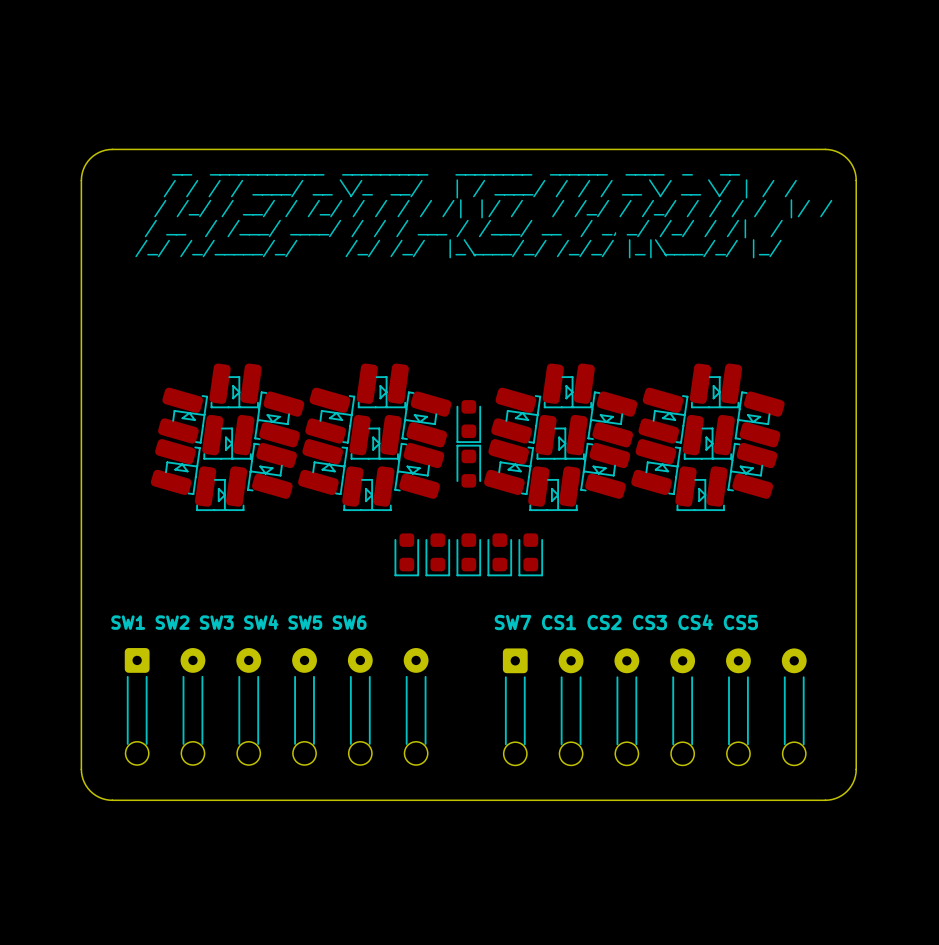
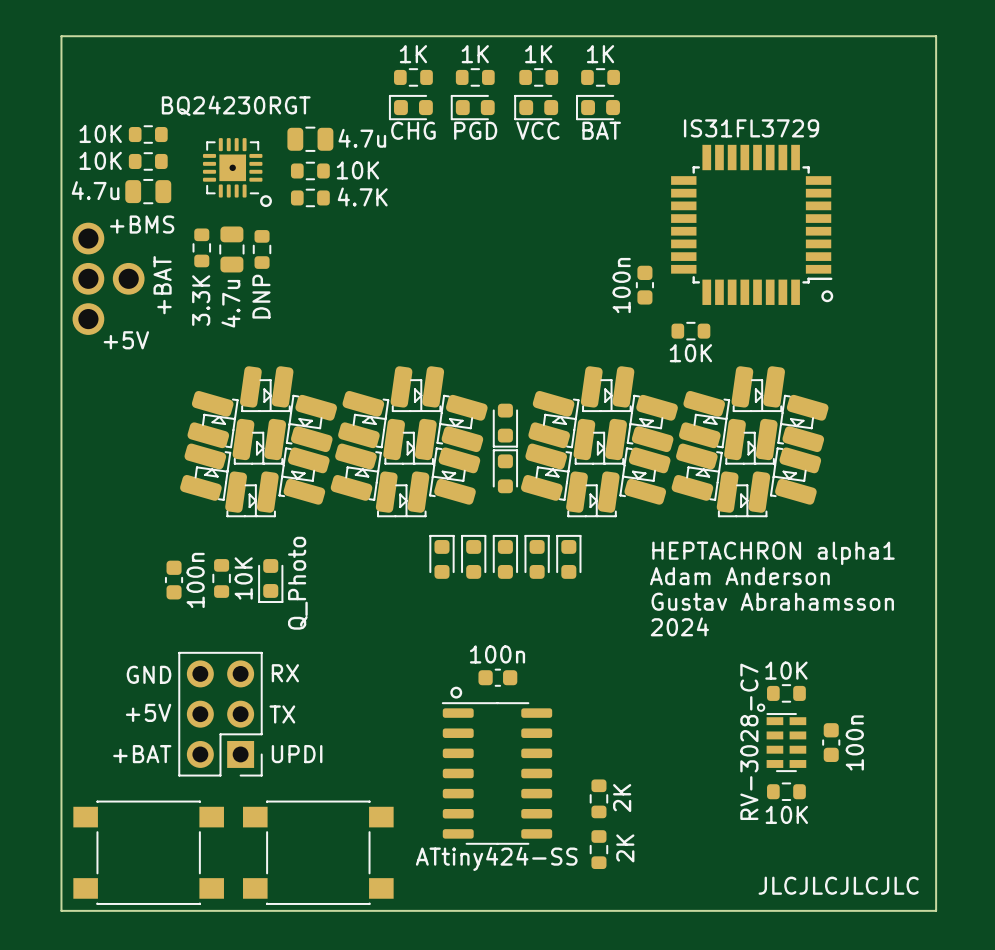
part: none -> 1K (413, 77)
part: none -> 1K (475, 77)
part: none -> 1K (538, 77)
part: none -> 1K (600, 77)
part: none -> CHG (410, 107)
part: none -> PGD (472, 107)
part: none -> VCC (536, 107)
part: none -> BAT (598, 107)
part: none -> 10K (148, 134)
part: none -> 4.7u (310, 139)
board edge: (112, 149) (825, 149) (835, 151) (844, 156) (853, 166) (856, 180) (856, 769) (854, 779) (849, 788) (838, 797) (825, 800) (112, 800) (102, 798) (93, 793) (84, 782) (81, 769) (81, 180) (84, 166) (90, 158) (102, 151) (112, 149) -> (61, 36) (61, 910) (936, 910) (936, 36) (61, 36)
part: none -> 10K (148, 161)
part: none -> BQ24230RGT (232, 167)
part: none -> 10K (310, 170)
text: __ ____________ _________ ________ ______ ____ _ __ (456, 174) -> none
text: / / / / ____/ __ \/_ __/ | / ____/ / / / __ \/ __ \/ | / / (480, 188) -> none
part: none -> 4.7u (148, 191)
drawing: none -> [260, 195, 272, 208]
part: none -> 4.7K (310, 197)
text: / /_/ / __/ / /_/ / / / / /| |/ / / /_/ / /_/ / / / / |/ / (493, 208) -> none
text: none -> +BMS (142, 224)
part: none -> IS31FL3729 (751, 224)
text: / __ / /___/ ____/ / / / ___ / /___/ __ / _, _/ /_/ / /| / (463, 228) -> none
part: none -> 3.3K (201, 247)
text: /_/ /_/_____/_/ /_/ /_/ |_\____/_/ /_/_/ |_|\____/_/ |_/ (458, 248) -> none
part: none -> 4.7u (231, 249)
part: none -> DNP (262, 249)
part: none -> (108, 278)
text: none -> +BAT (162, 285)
part: none -> 100n (644, 285)
drawing: none -> [821, 290, 834, 303]
part: none -> 10K (690, 331)
text: none -> +5V (126, 340)
text: none -> HEPTACHRON alpha1 (773, 553)
part rotation: 0° (406, 554) -> 180° (441, 556)
part rotation: 0° (437, 554) -> 180° (473, 556)
part rotation: 0° (468, 554) -> 180° (505, 556)
part rotation: 0° (499, 554) -> 180° (537, 556)
part rotation: 0° (530, 554) -> 180° (568, 556)
text: none -> Adam Anderson (739, 576)
part: none -> 10K (221, 578)
part: none -> 100n (174, 580)
part: none -> Q_Photo (270, 581)
text: none -> Gustav Abrahamsson (772, 601)
text: none -> 2024 (679, 626)
text: SW1 SW2 SW3 SW4 SW5 SW6 (238, 622) -> none
text: SW7 CS1 CS2 CS3 CS4 CS5 (626, 622) -> none
text: none -> RX (285, 673)
text: none -> GND (149, 674)
part: none -> 100n (497, 677)
drawing: none -> [450, 686, 463, 699]
part: none -> 10K (786, 693)
text: none -> +5V (148, 712)
part: none -> (220, 714)
text: none -> TX (282, 714)
part: (276, 706) -> none
part: (654, 706) -> none
part: none -> RV-3028-C7 (781, 737)
part: none -> 100n (831, 742)
text: none -> +BAT (142, 754)
text: none -> UPDI (297, 754)
part: none -> ATtiny424-SS (497, 773)
part: none -> 10K (786, 791)
part: none -> 2K (598, 798)
part: none -> 2K (598, 849)
part: none -> (148, 852)
part: none -> (318, 852)
text: none -> JLCJLCJLCJLC (838, 885)

